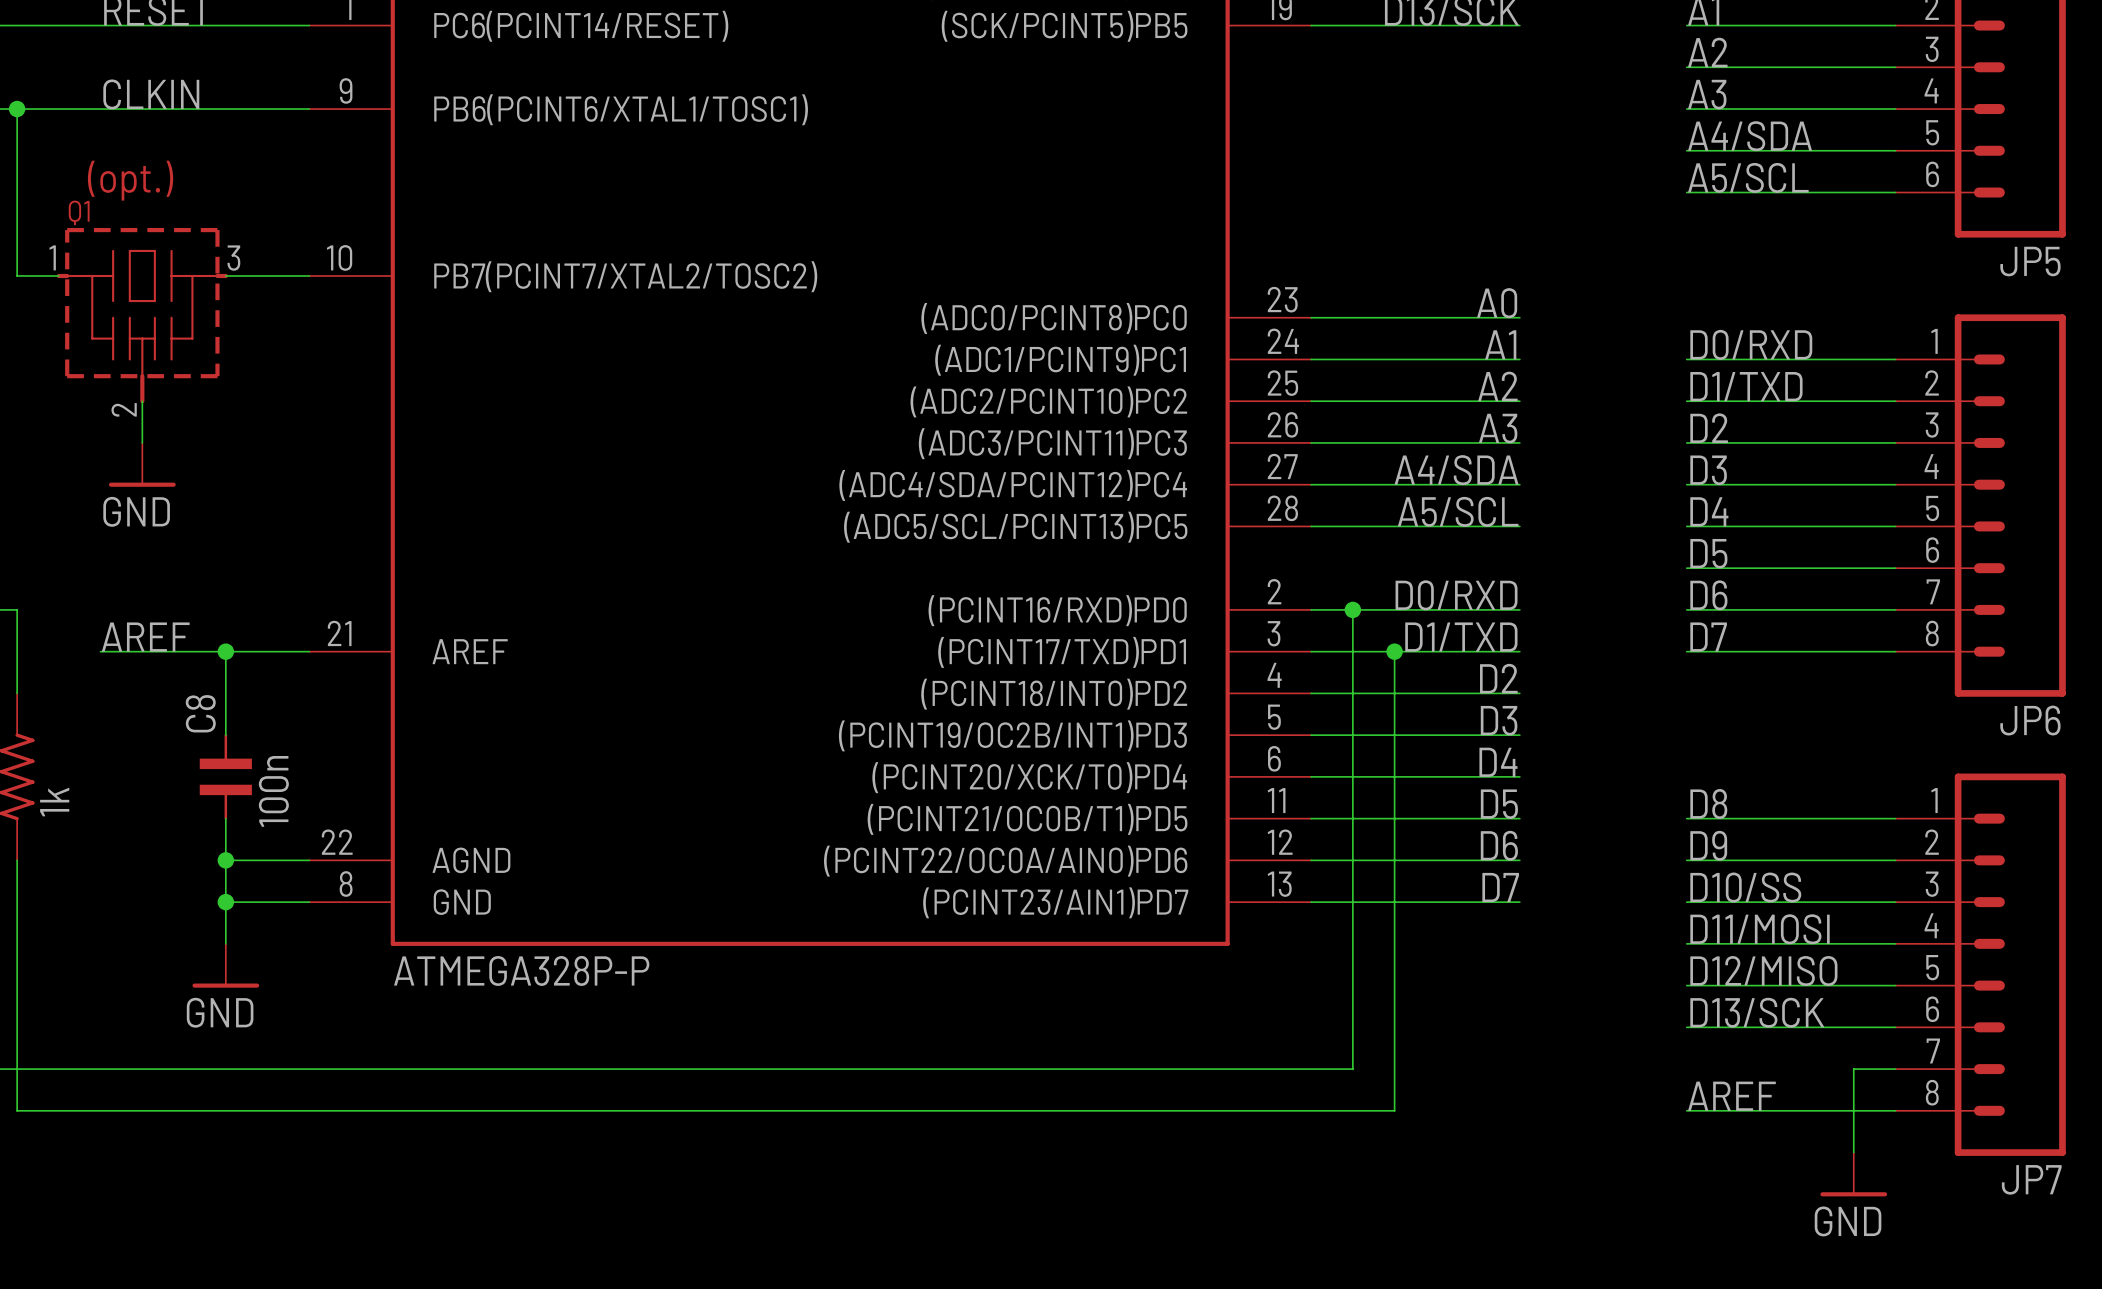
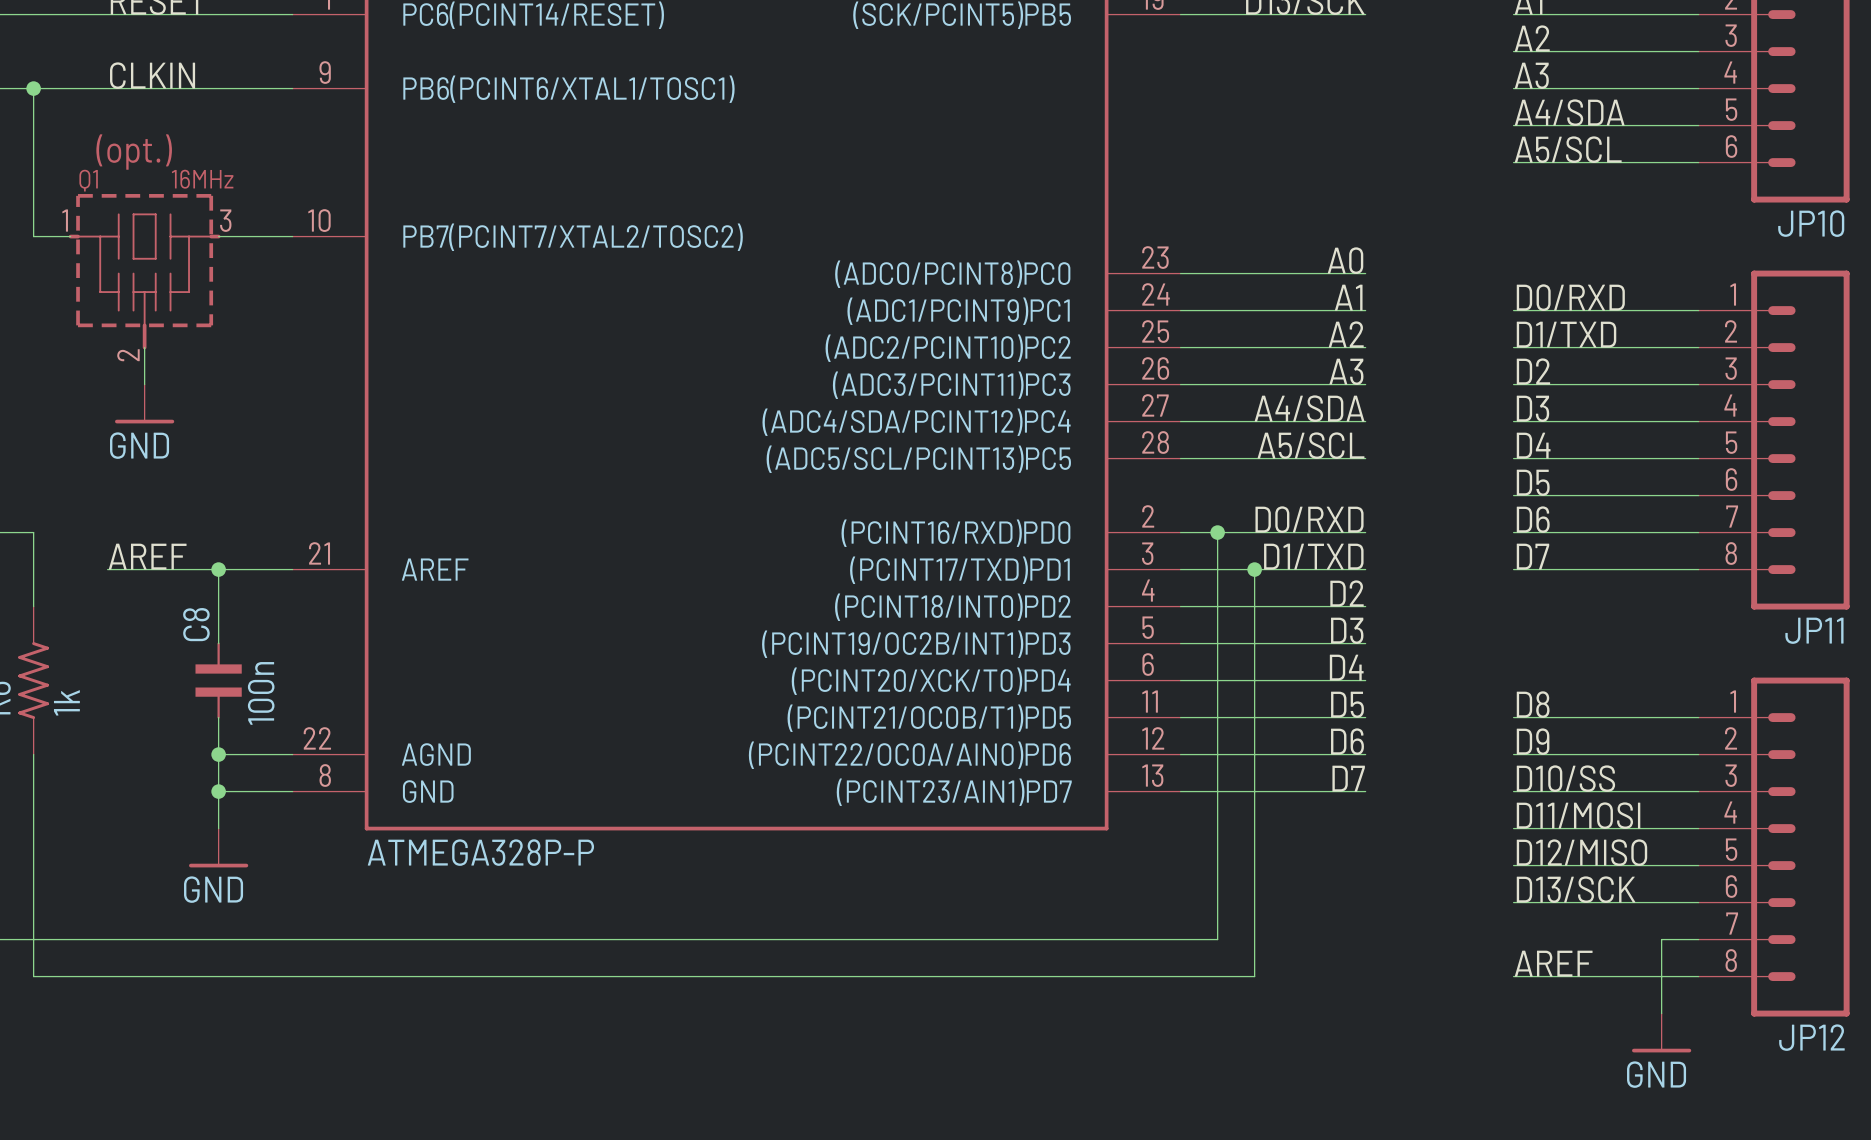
Q1 value: none -> 16MHz (202, 179)
JP5 name: JP5 (2030, 261) -> JP10 (1811, 223)
JP6 name: JP6 (2030, 720) -> JP11 (1814, 630)
JP7 name: JP7 (2031, 1179) -> JP12 (1811, 1037)

